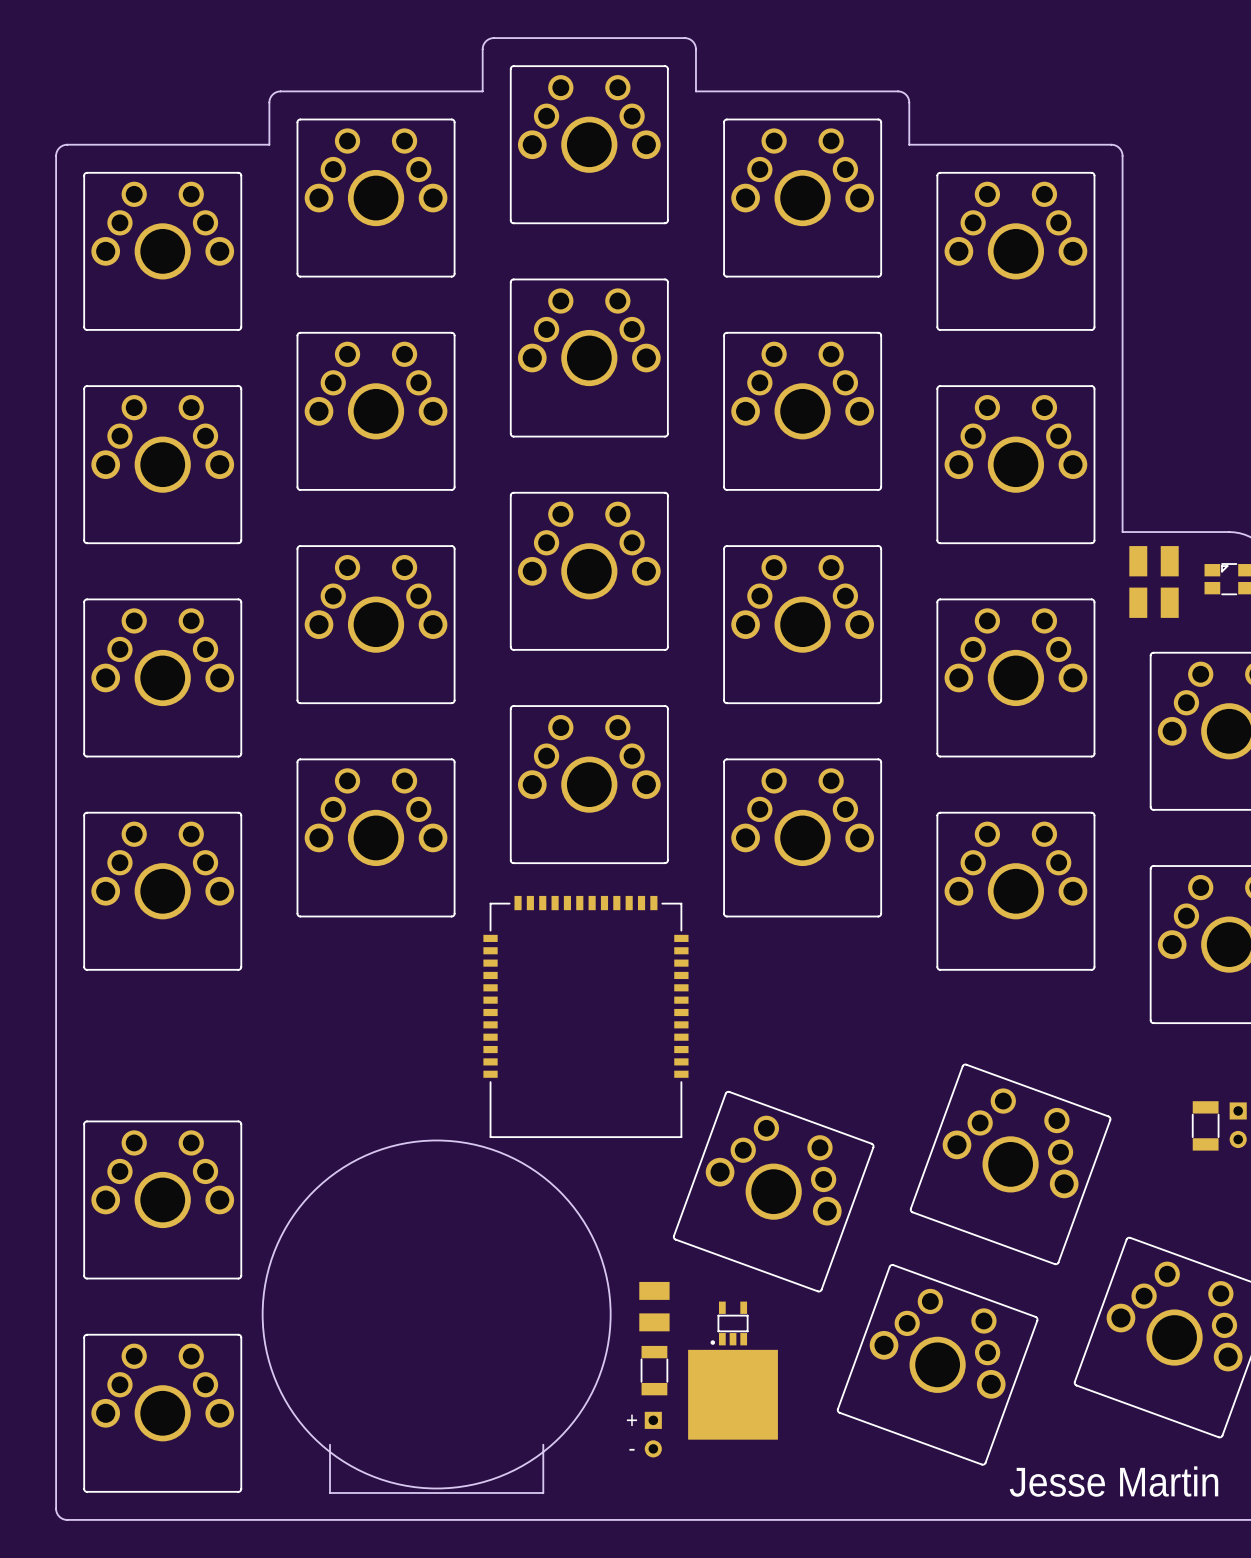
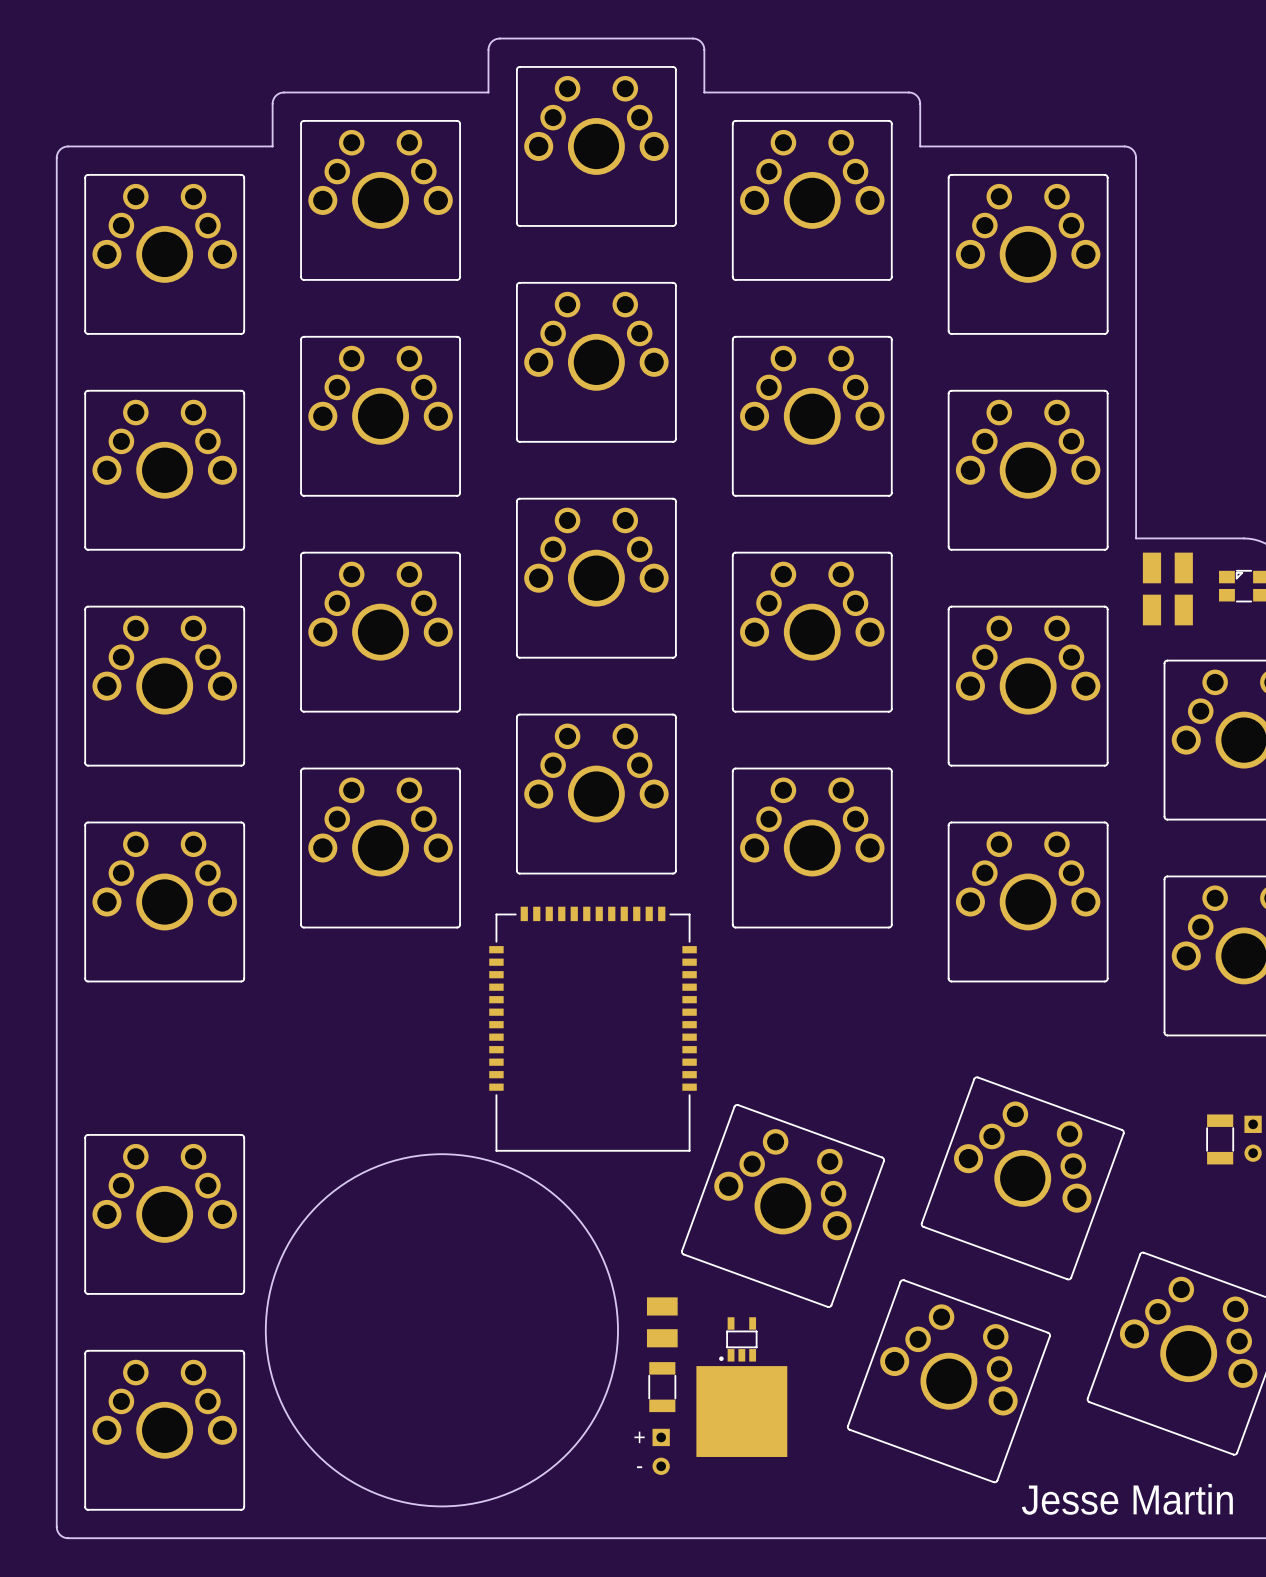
board edge: (330, 1444) (330, 1492) (543, 1492) (543, 1444) -> none

